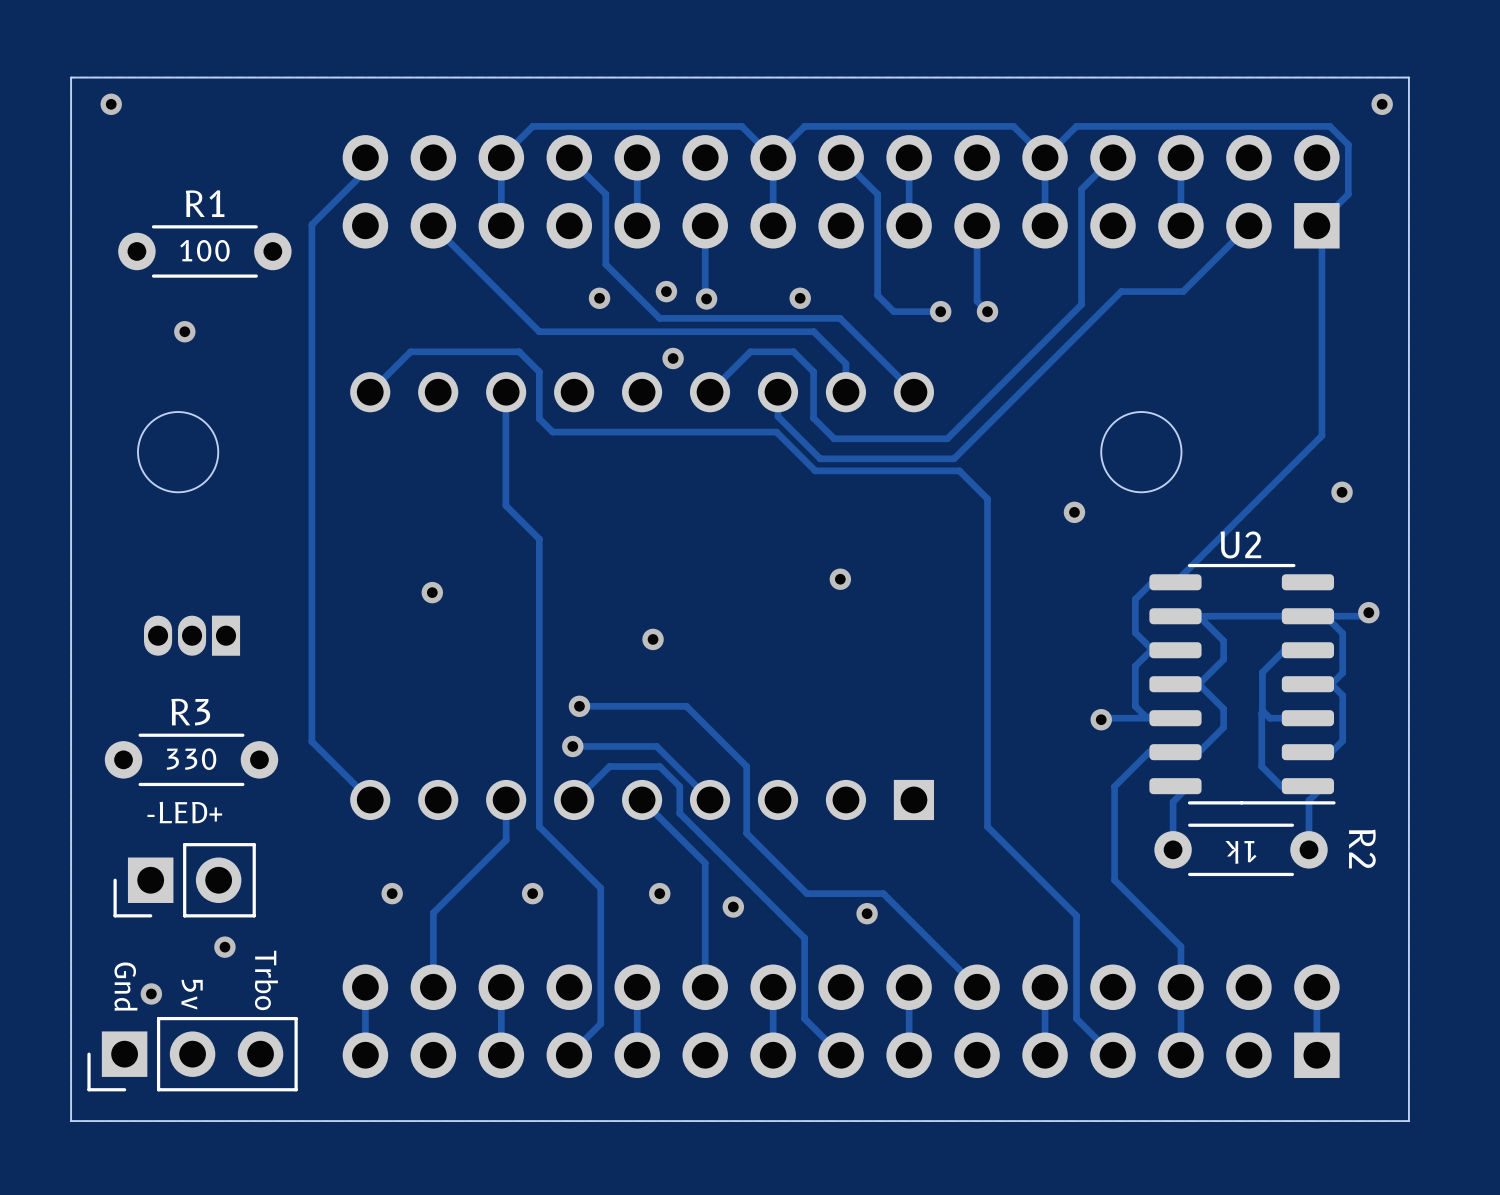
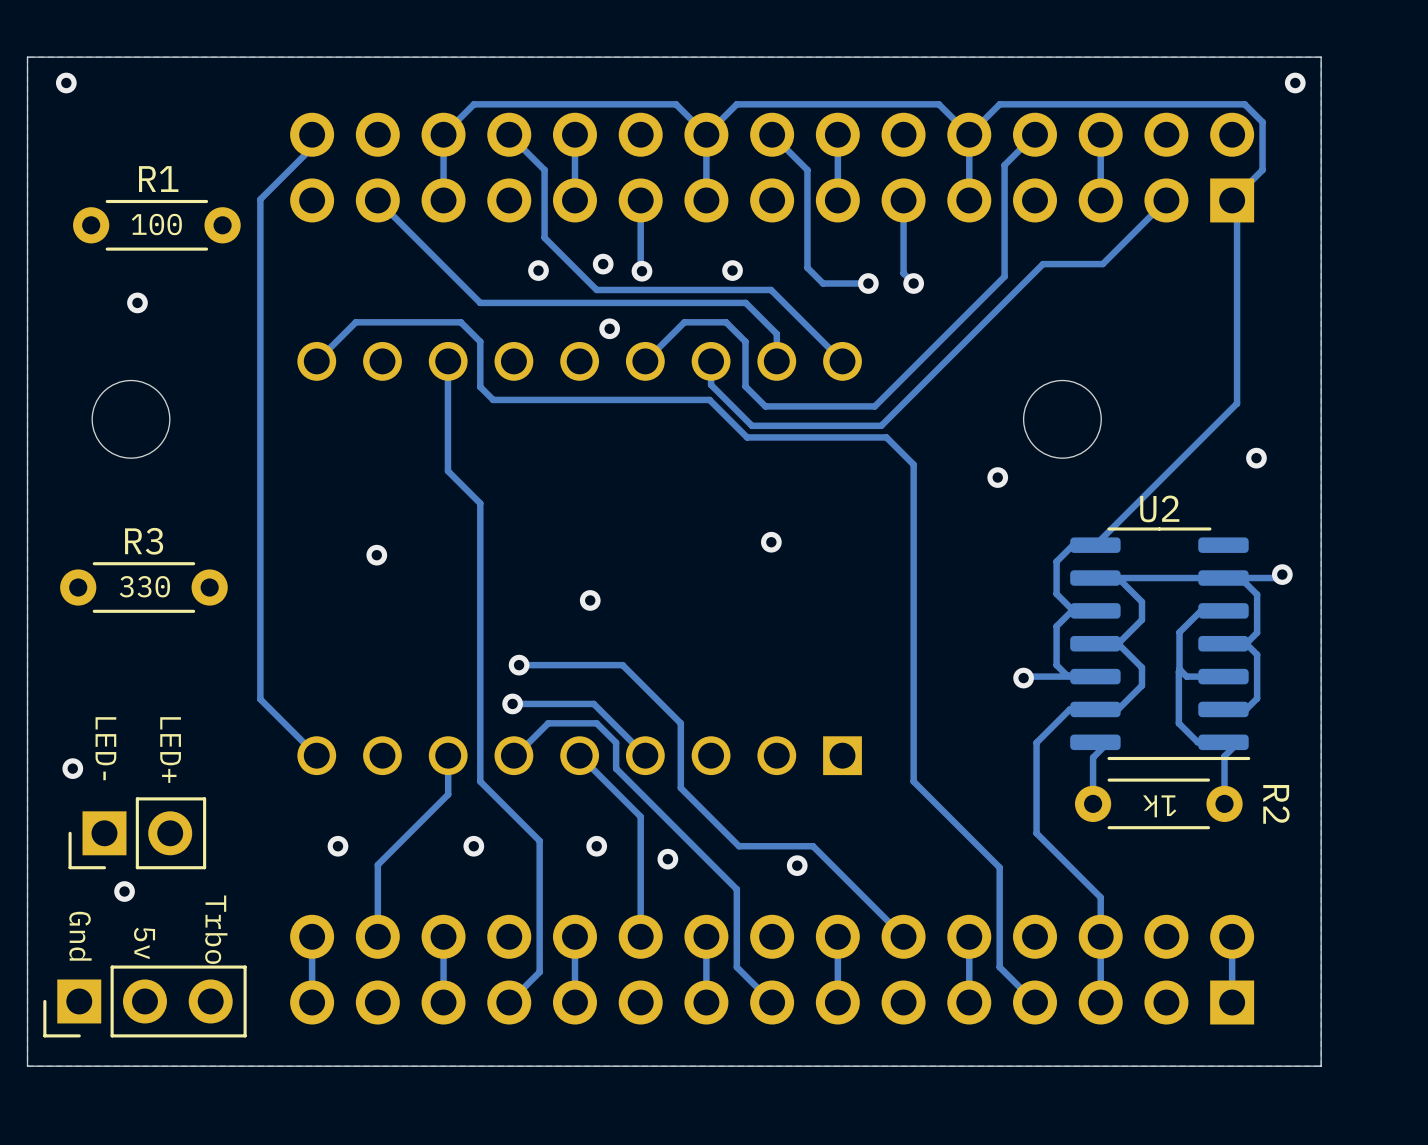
part: (192, 635) -> none
R3 position: (191, 759) -> (143, 587)
text position: 330 (191, 759) -> 330 (144, 586)
text: none -> LED- (105, 748)
text: none -> LED+ (170, 750)
text: -LED+ (184, 812) -> none
via: none -> (72, 768)
via: none -> (124, 891)
via: (224, 947) -> none
via: (151, 993) -> none

